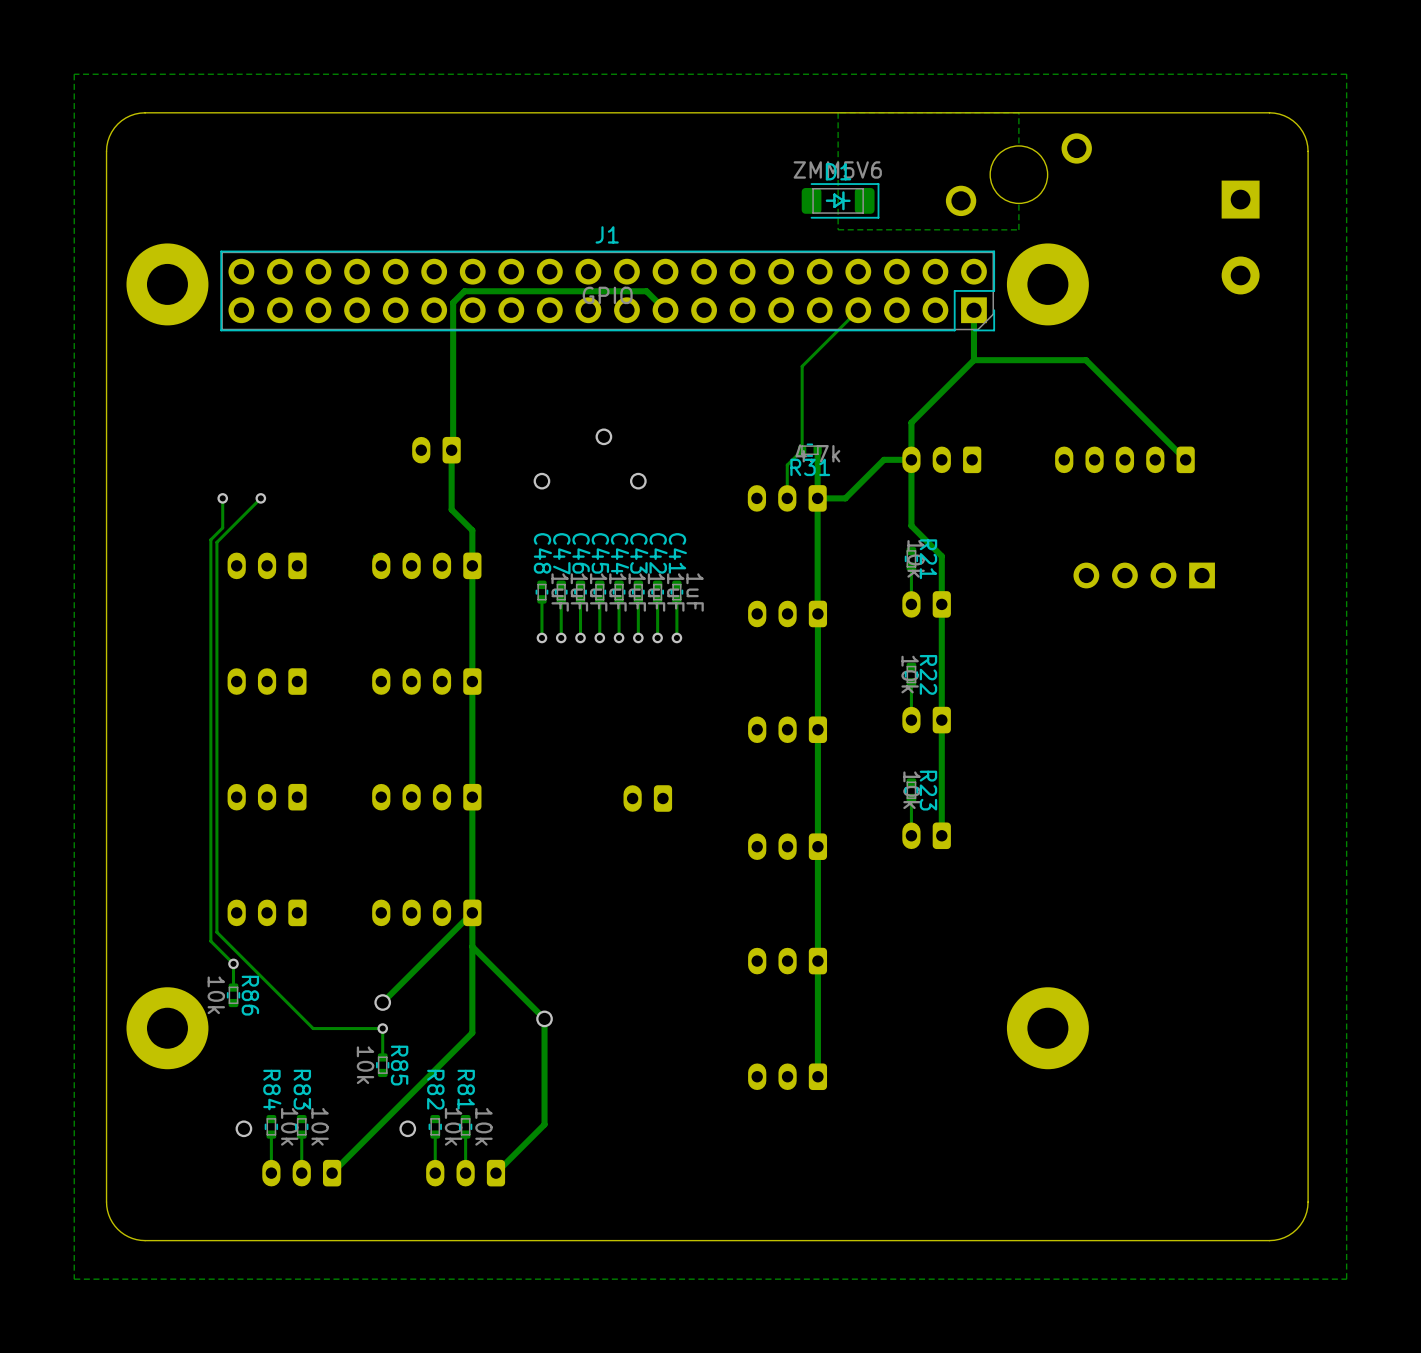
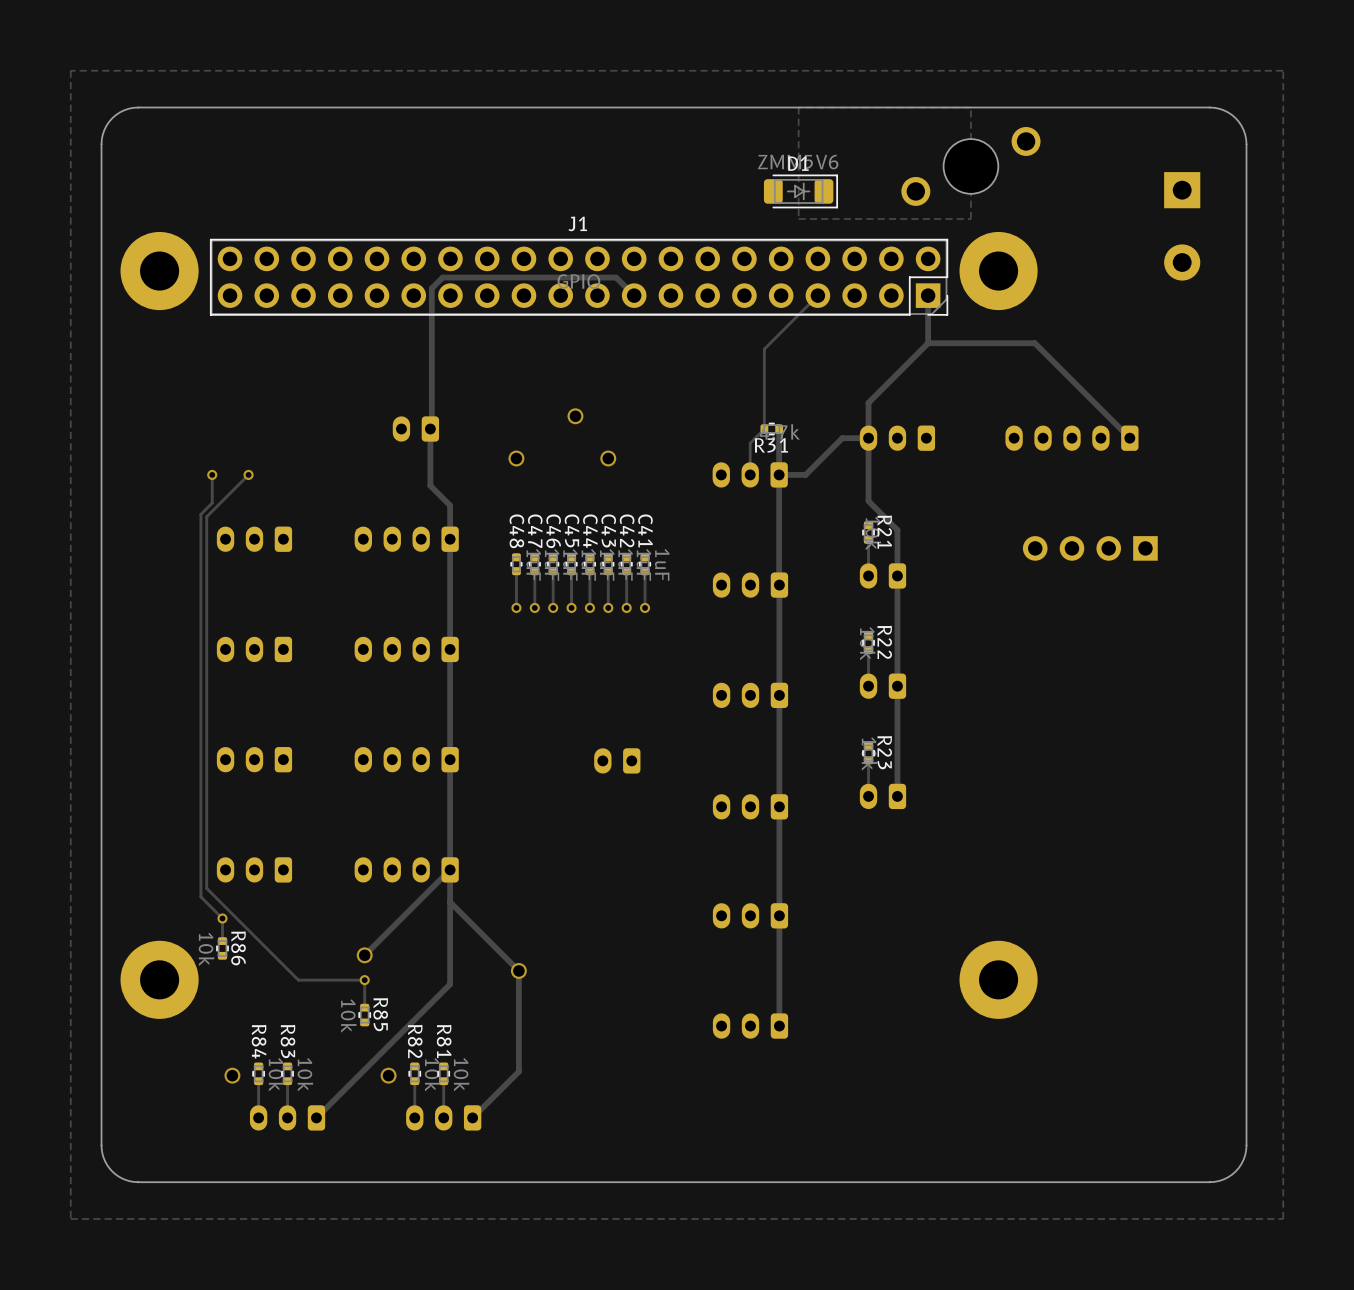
line: (843, 192) (843, 209) -> none
line: (834, 200) (826, 200) -> none
line: (843, 200) (834, 206) (834, 194) (843, 200) -> none
line: (849, 200) (843, 200) -> none

